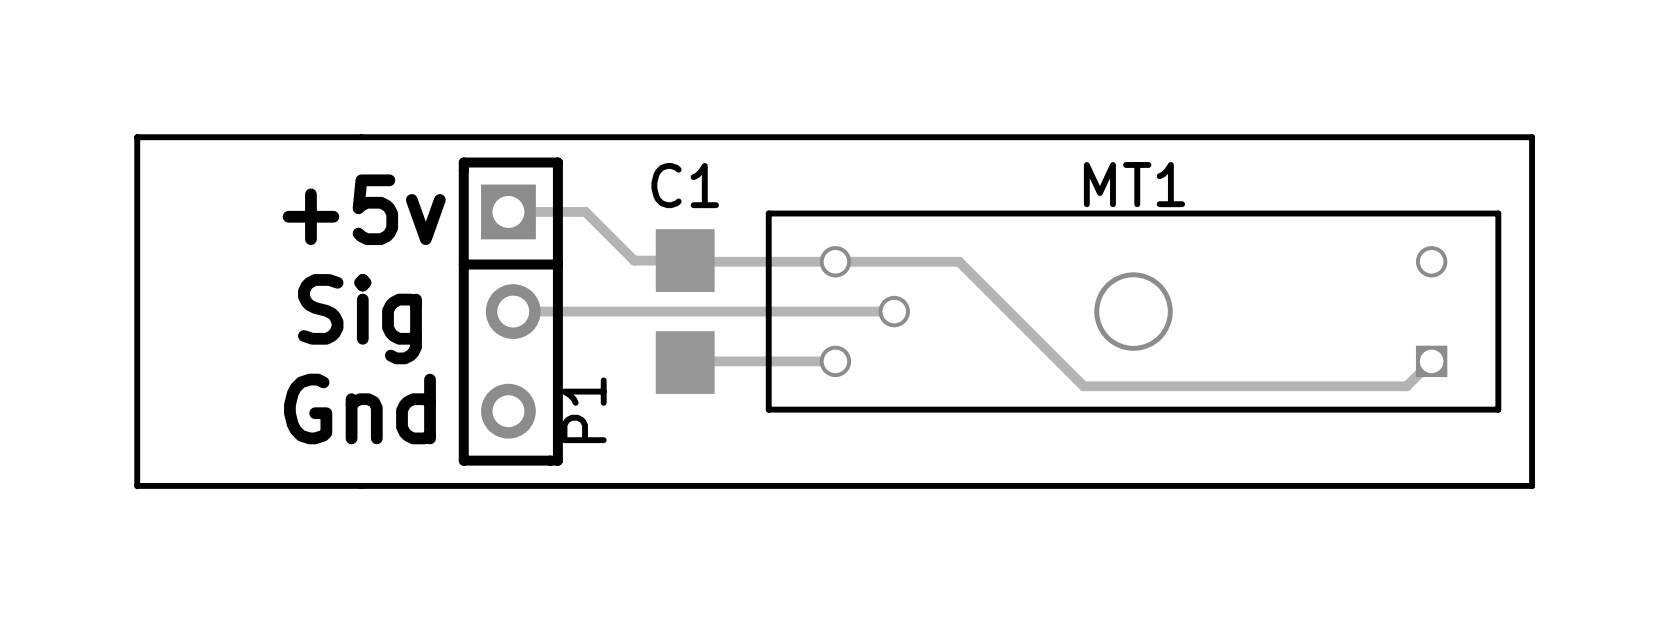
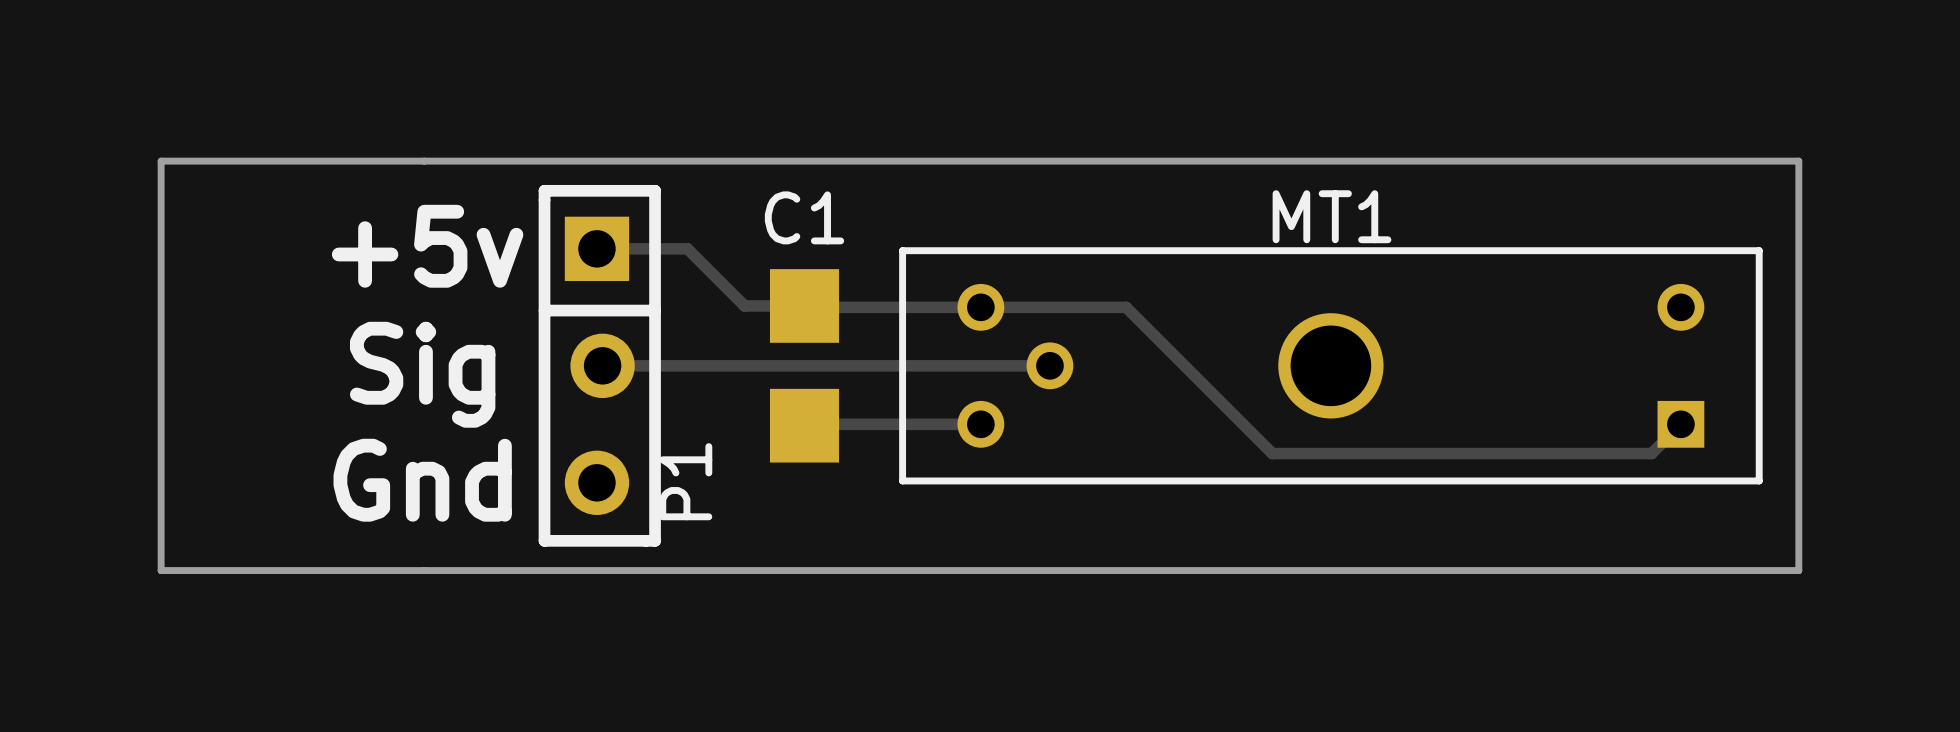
MT1 footprint: [765, 210, 1502, 413] -> [899, 247, 1763, 485]

